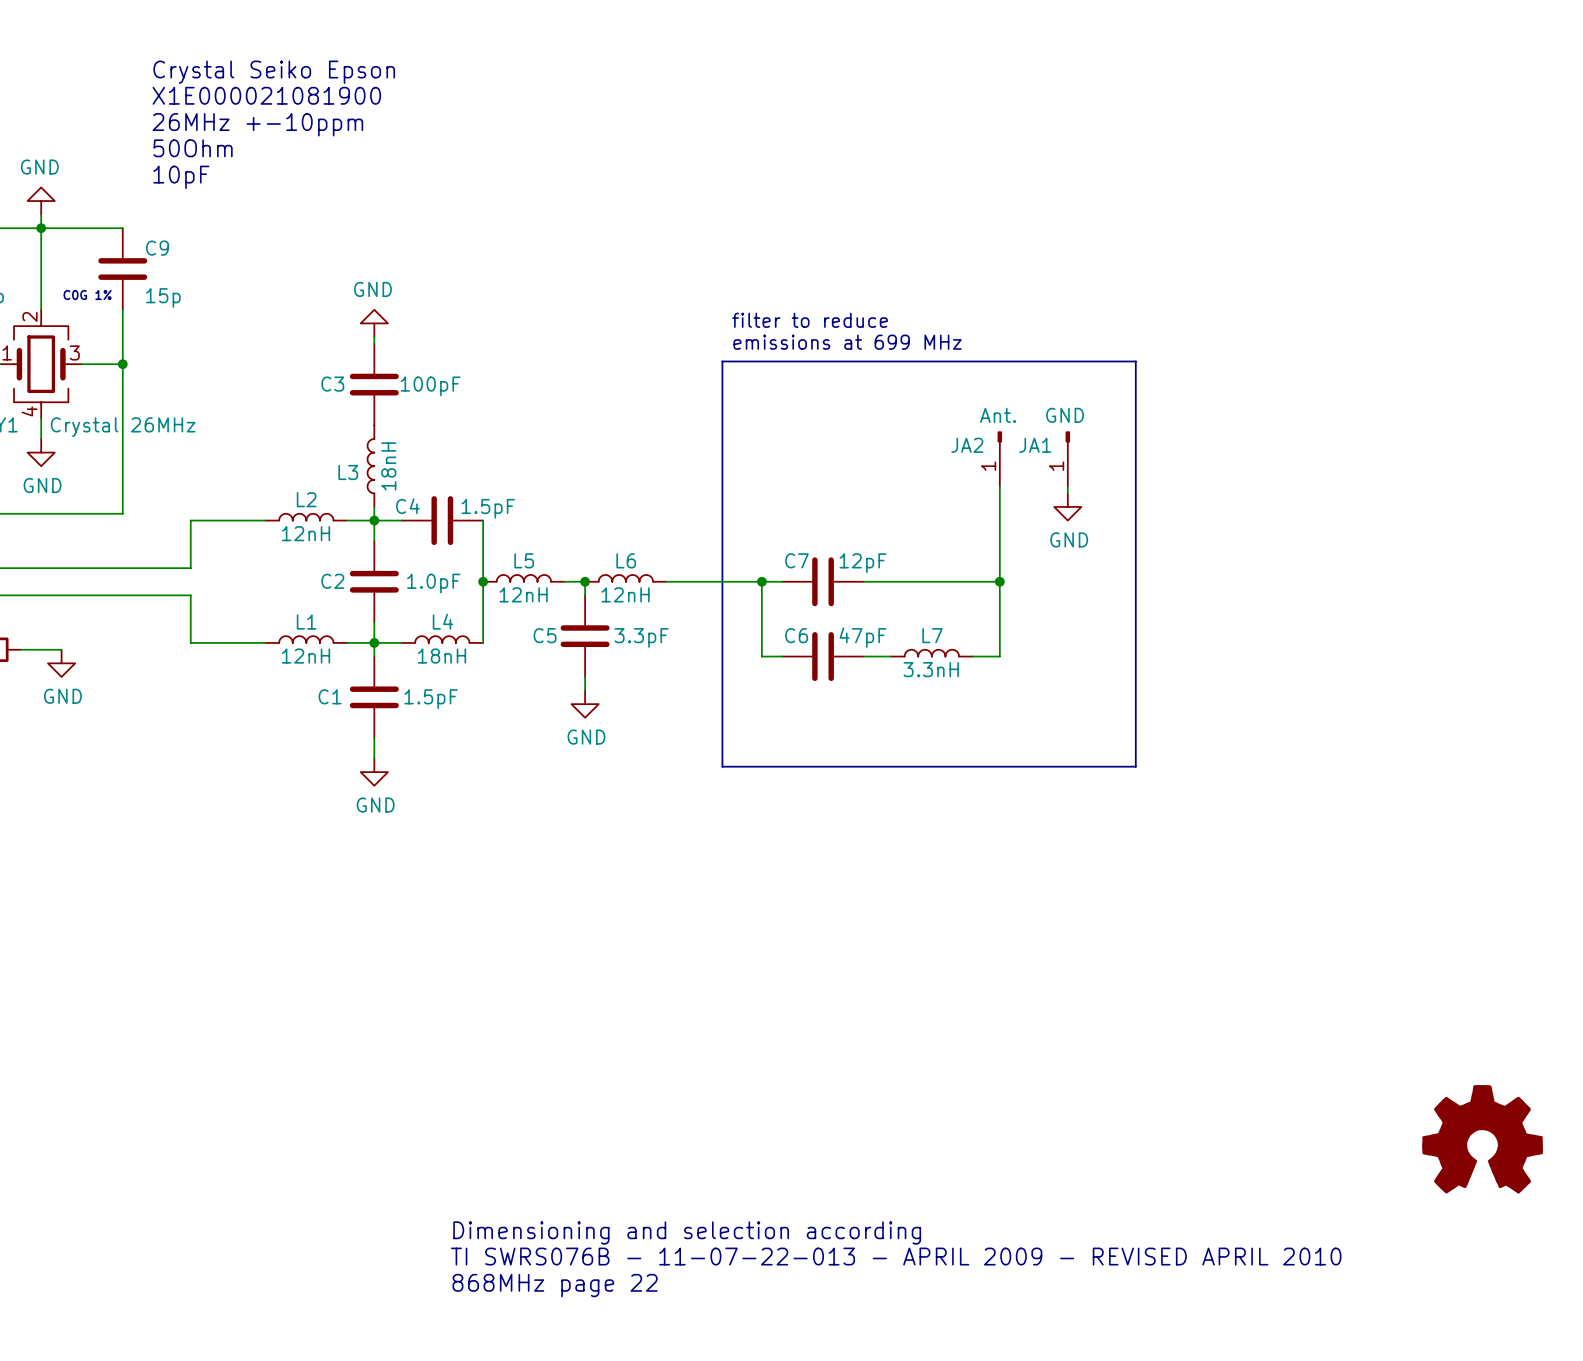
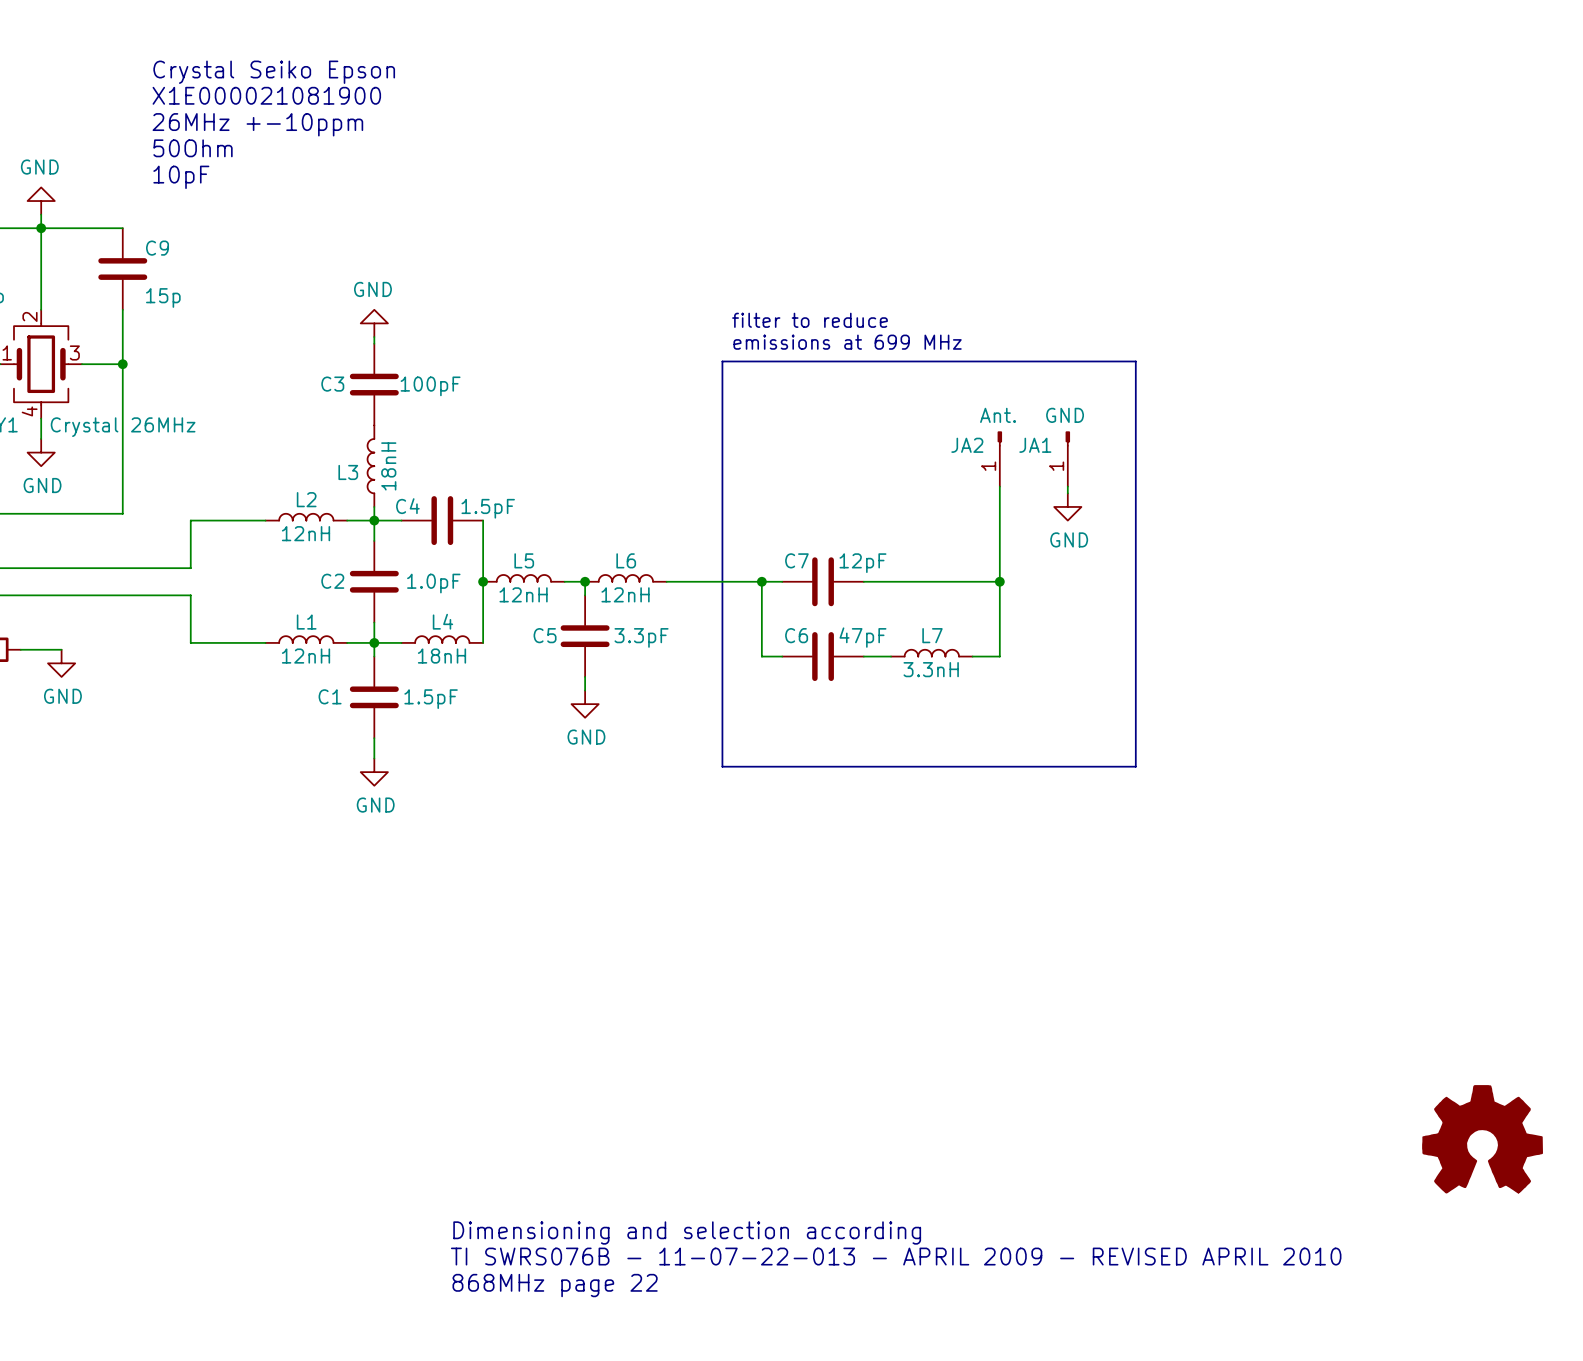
text: C0G 1% (87, 295) -> none

